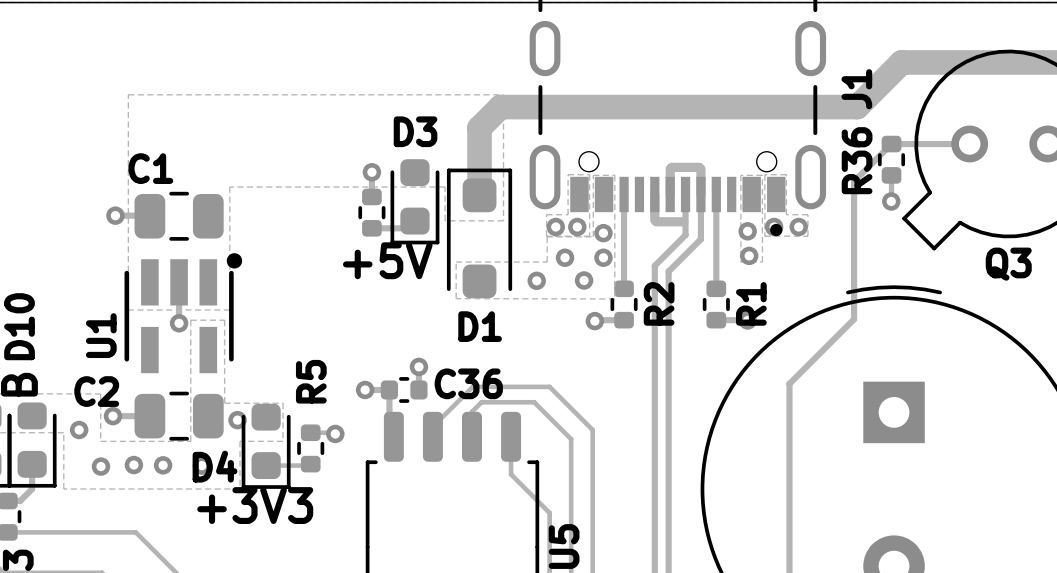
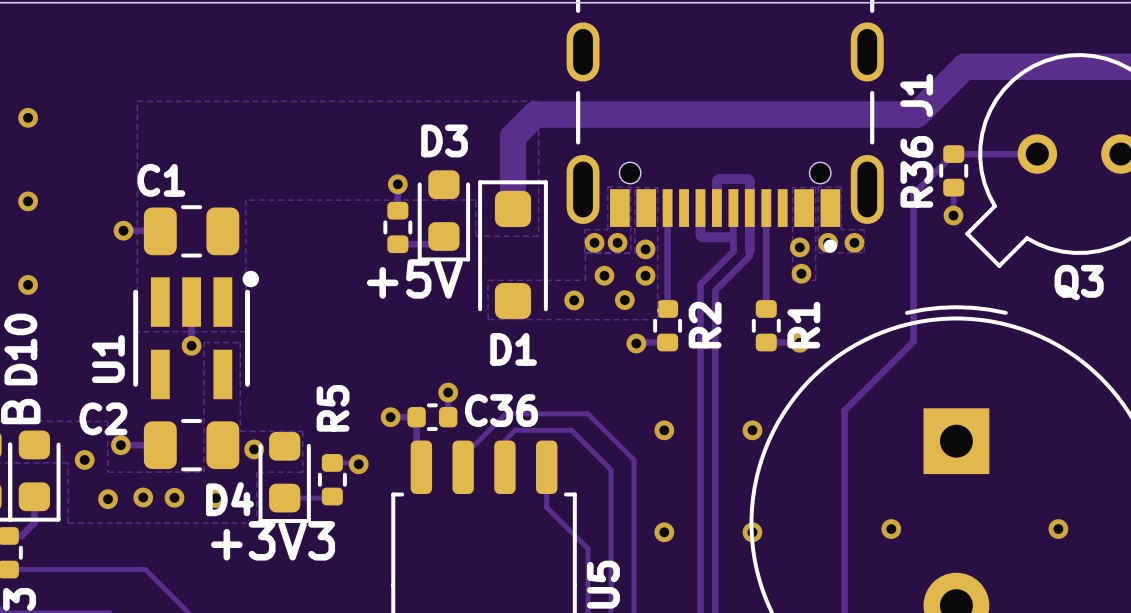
via: none -> (28, 117)
via: none -> (28, 201)
via: none -> (28, 284)
via: none -> (664, 430)
via: none -> (752, 430)
via: none -> (891, 529)
via: none -> (1058, 529)
via: none -> (664, 532)
via: none -> (752, 532)

